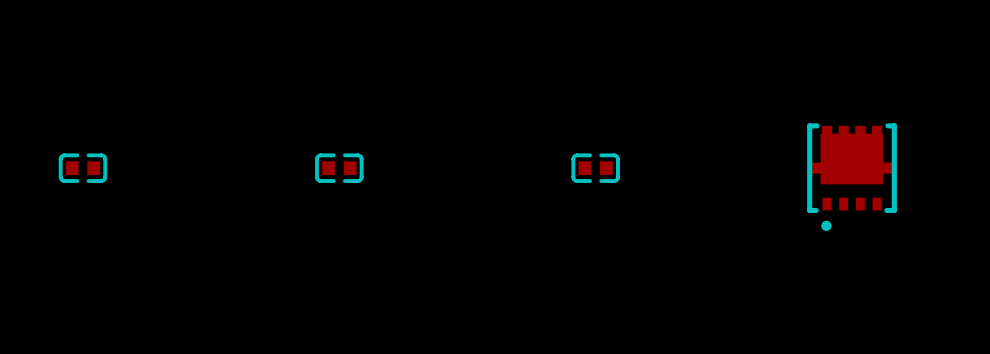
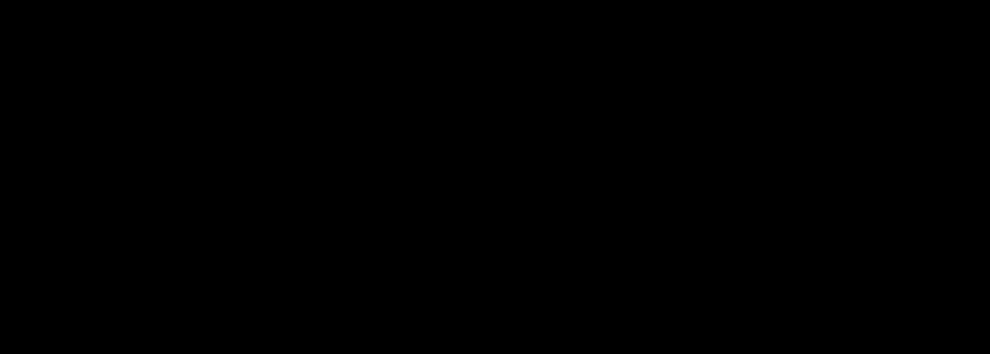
part: (82, 168) -> none
part: (339, 168) -> none
part: (595, 168) -> none
part: (852, 177) -> none

